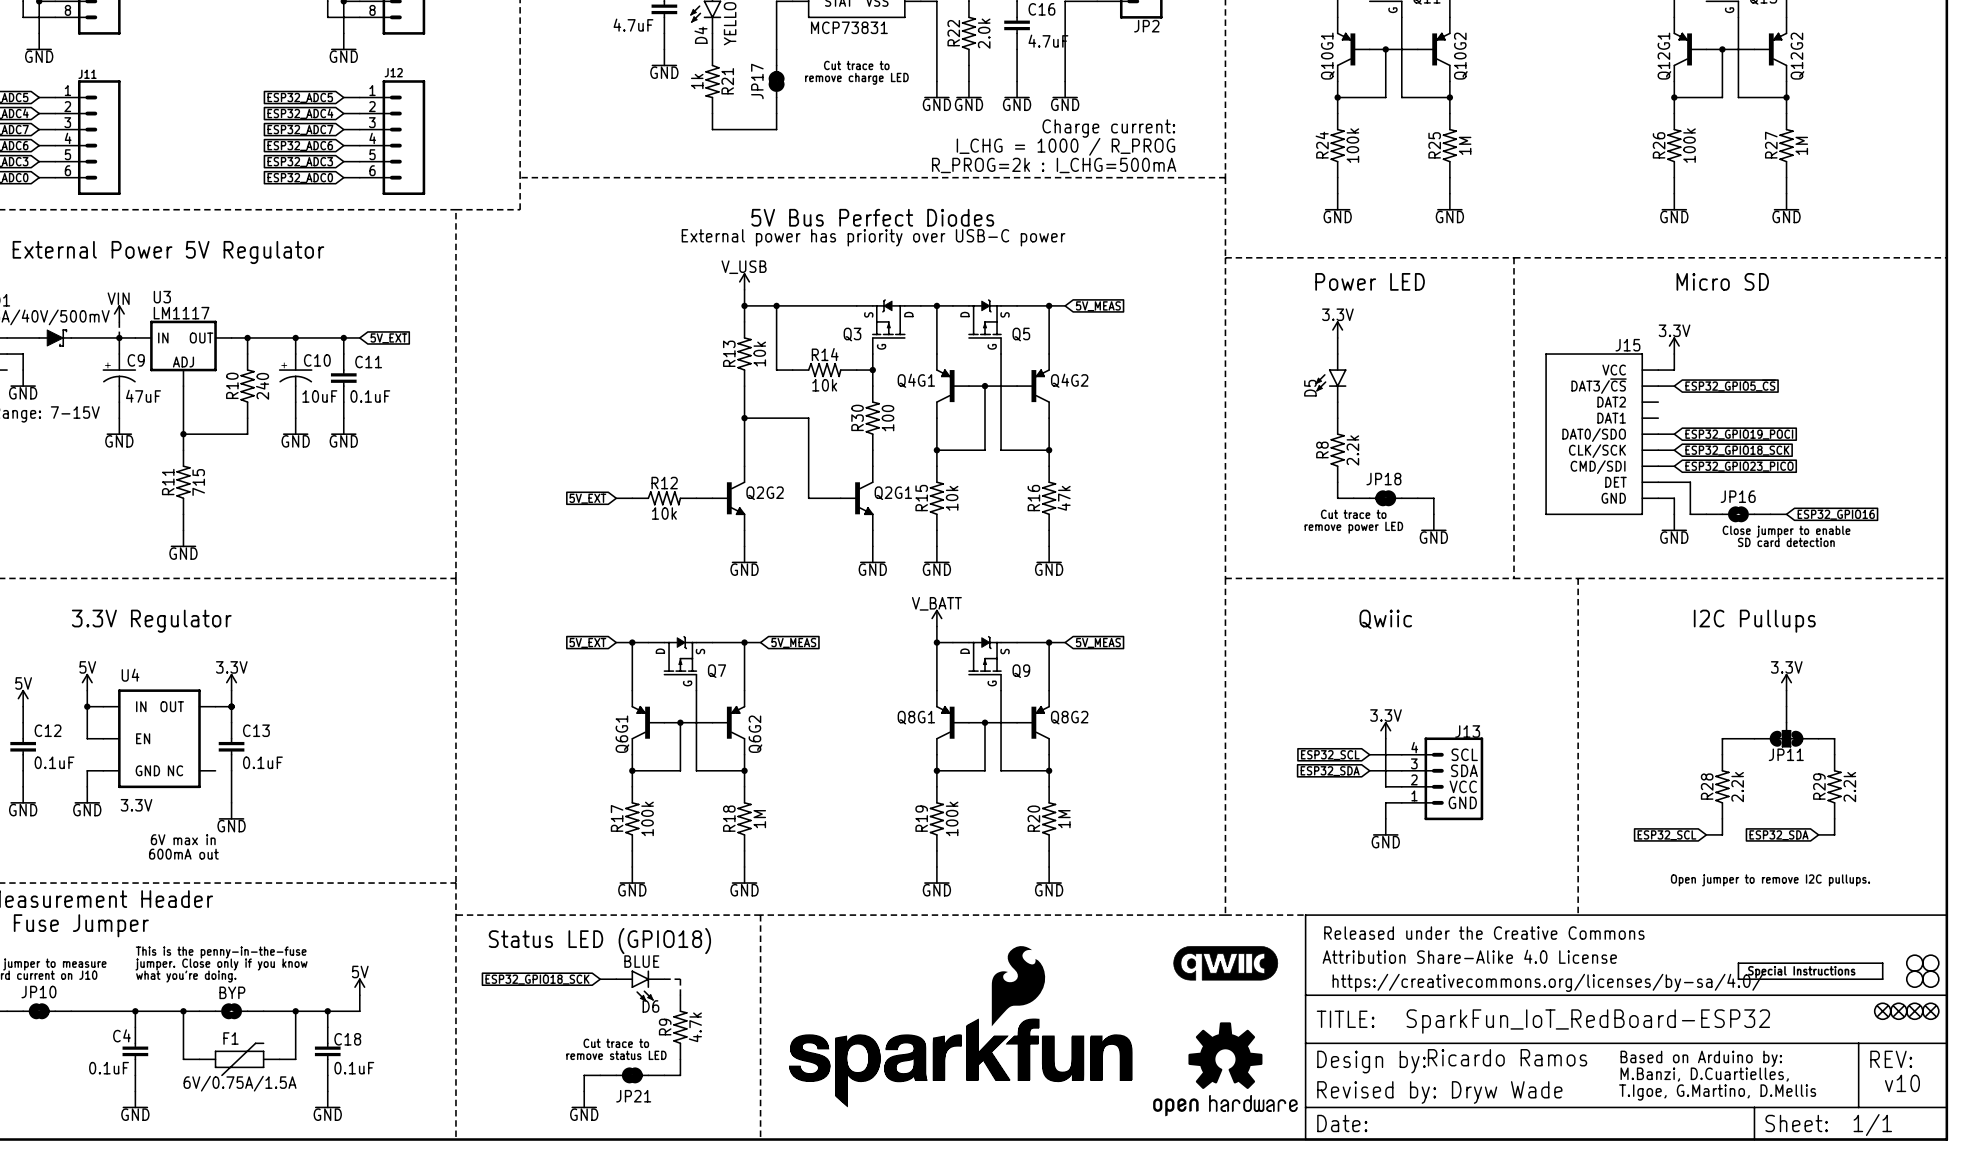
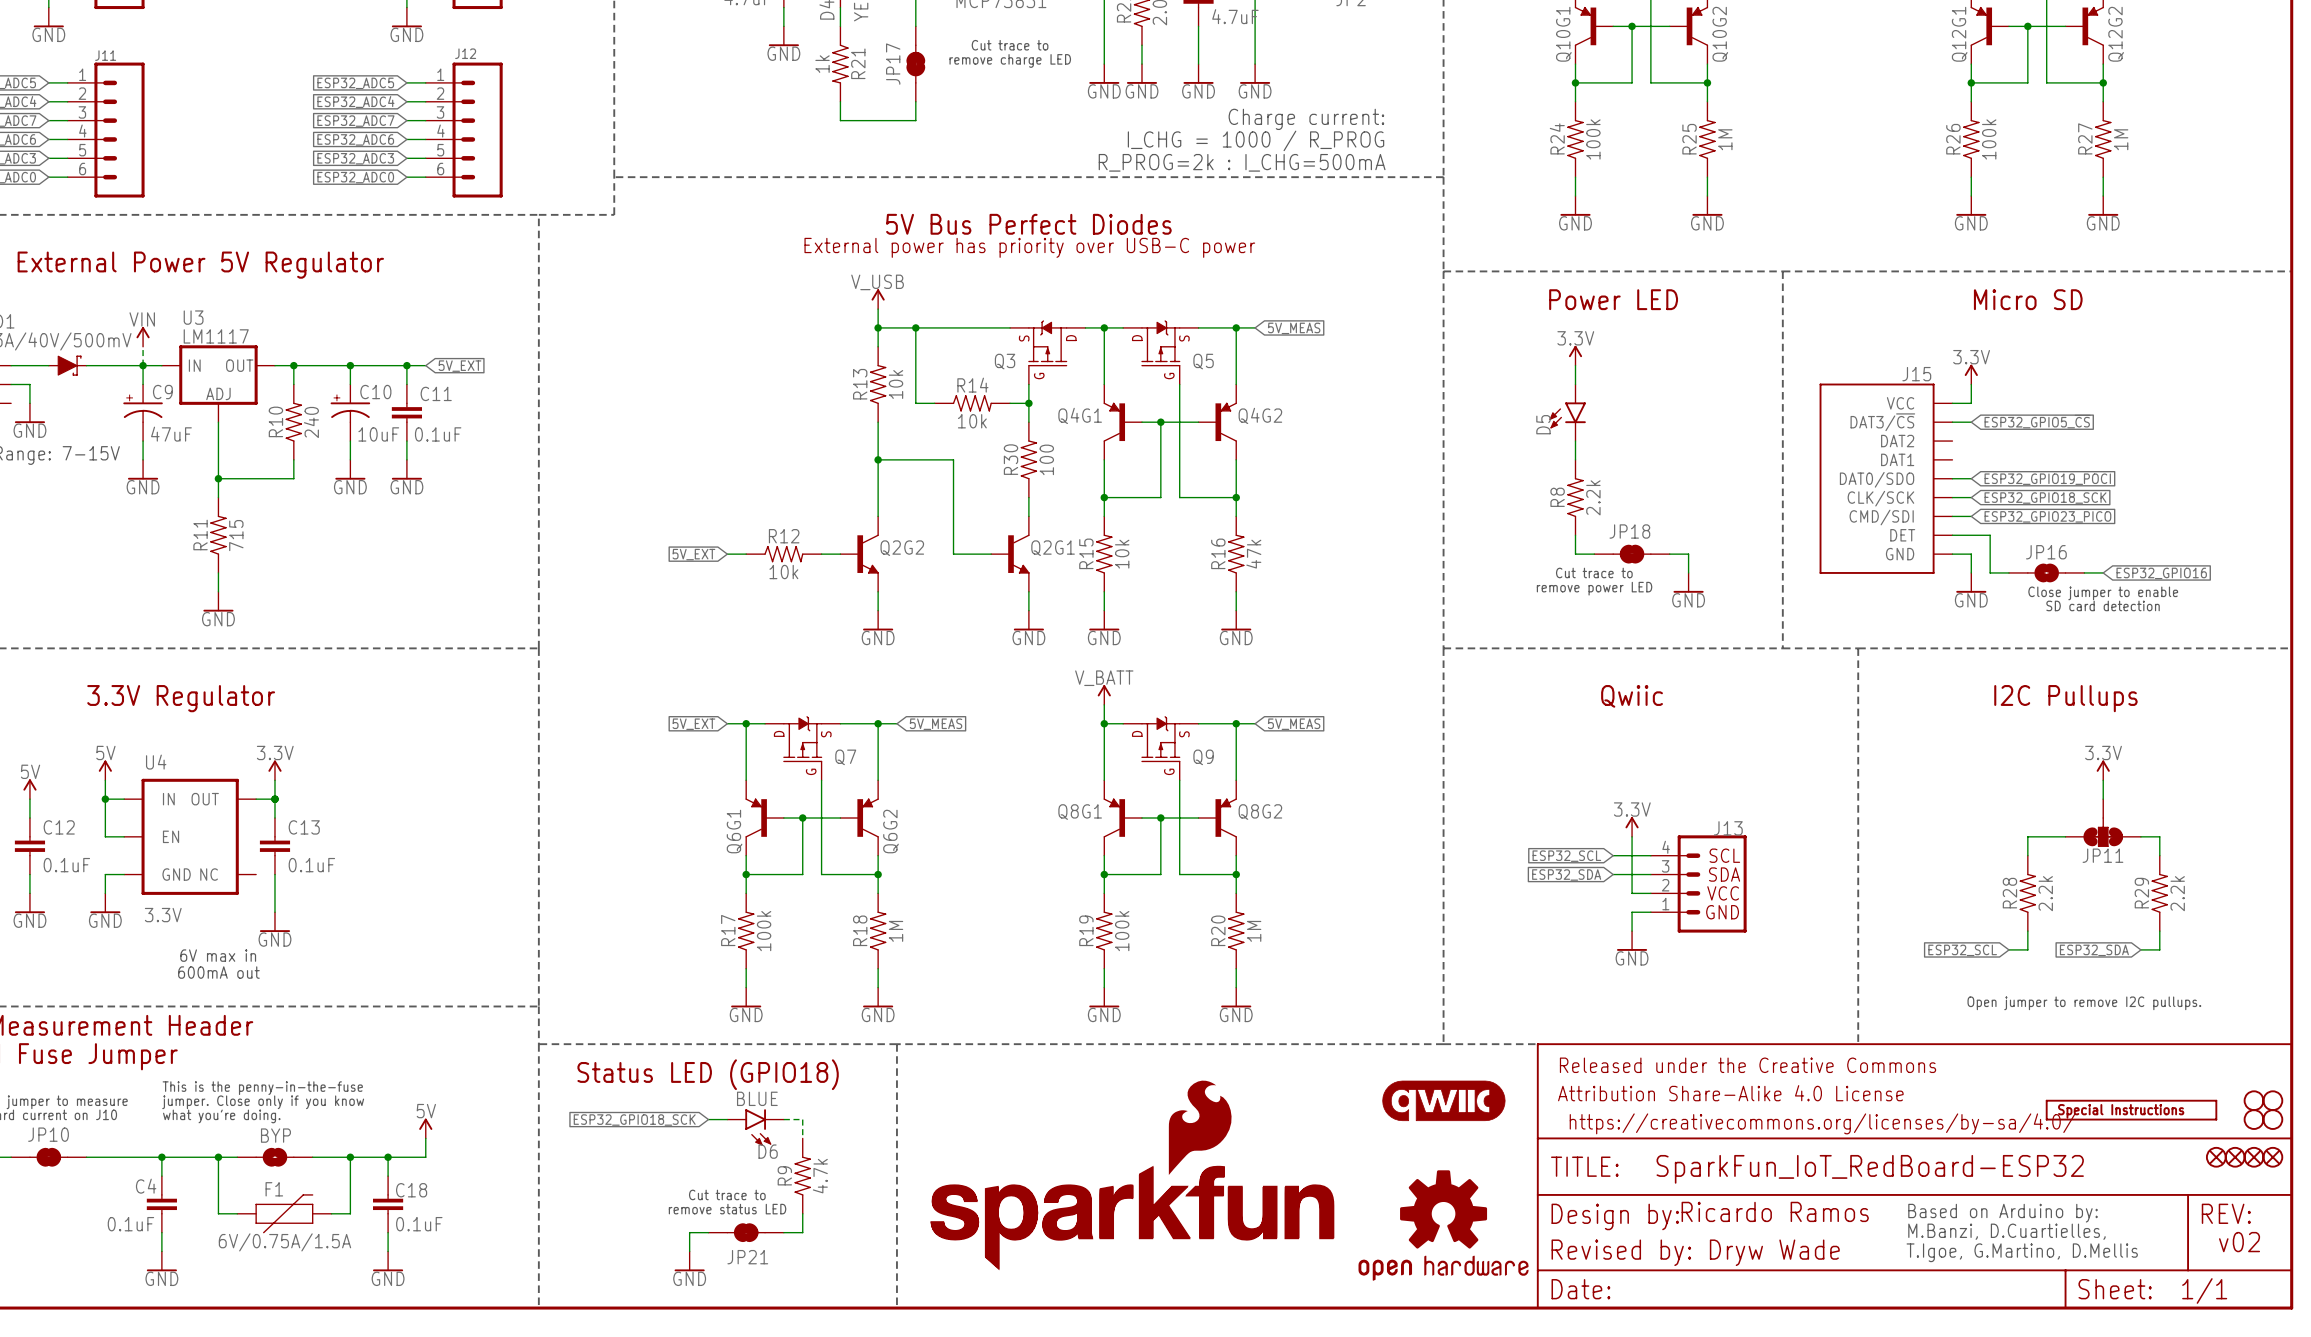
text: v10 (1902, 1083) -> v02 (2239, 1242)

